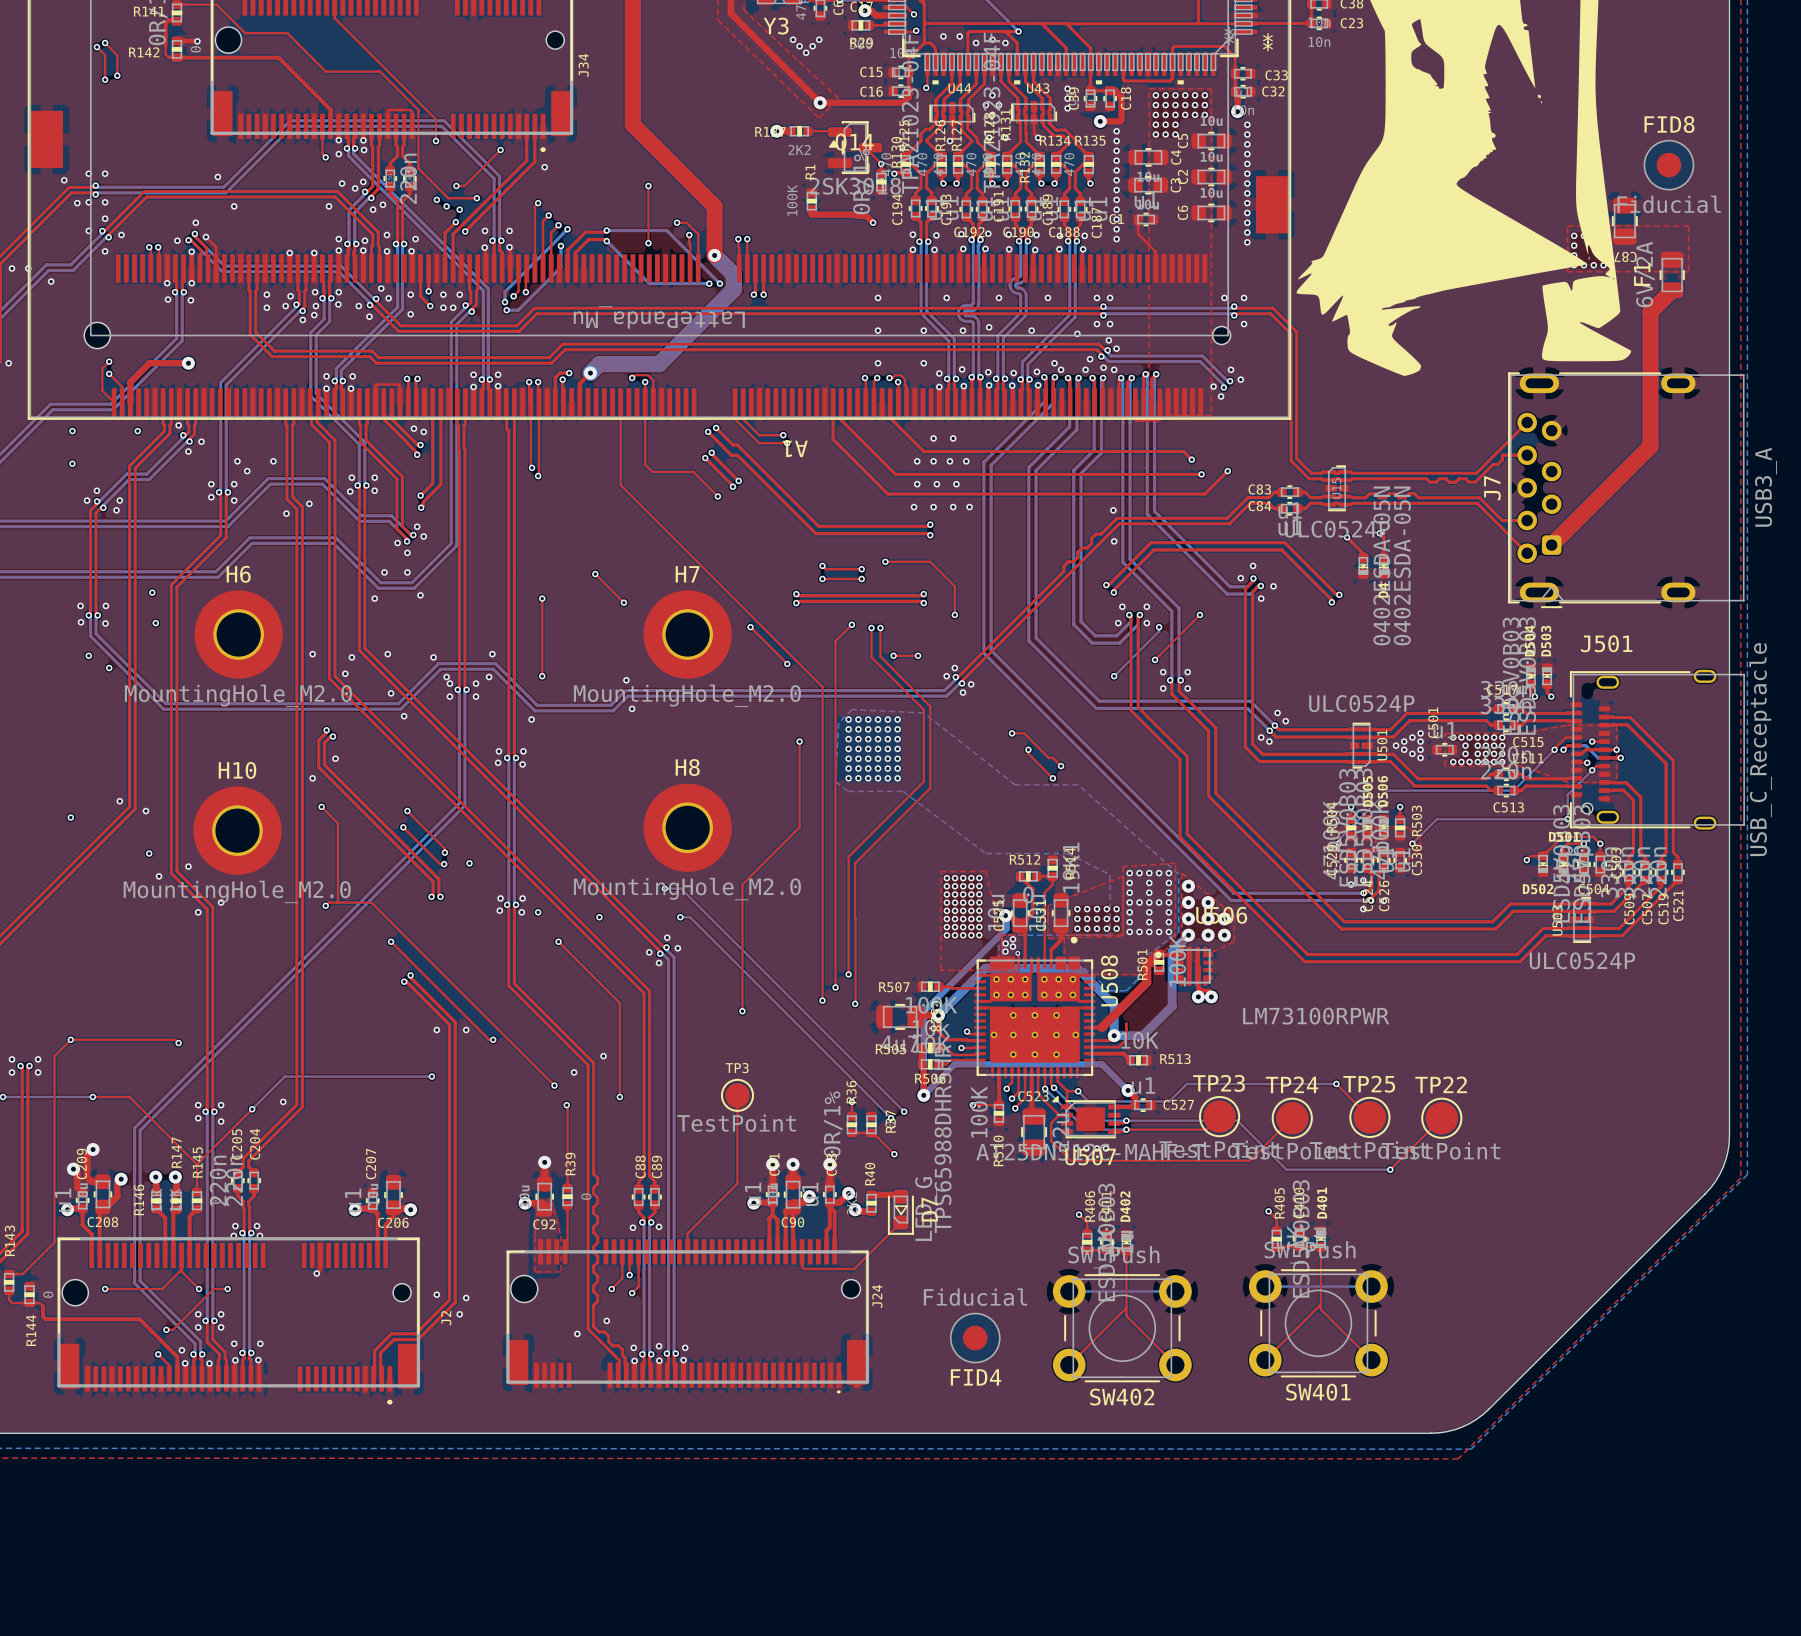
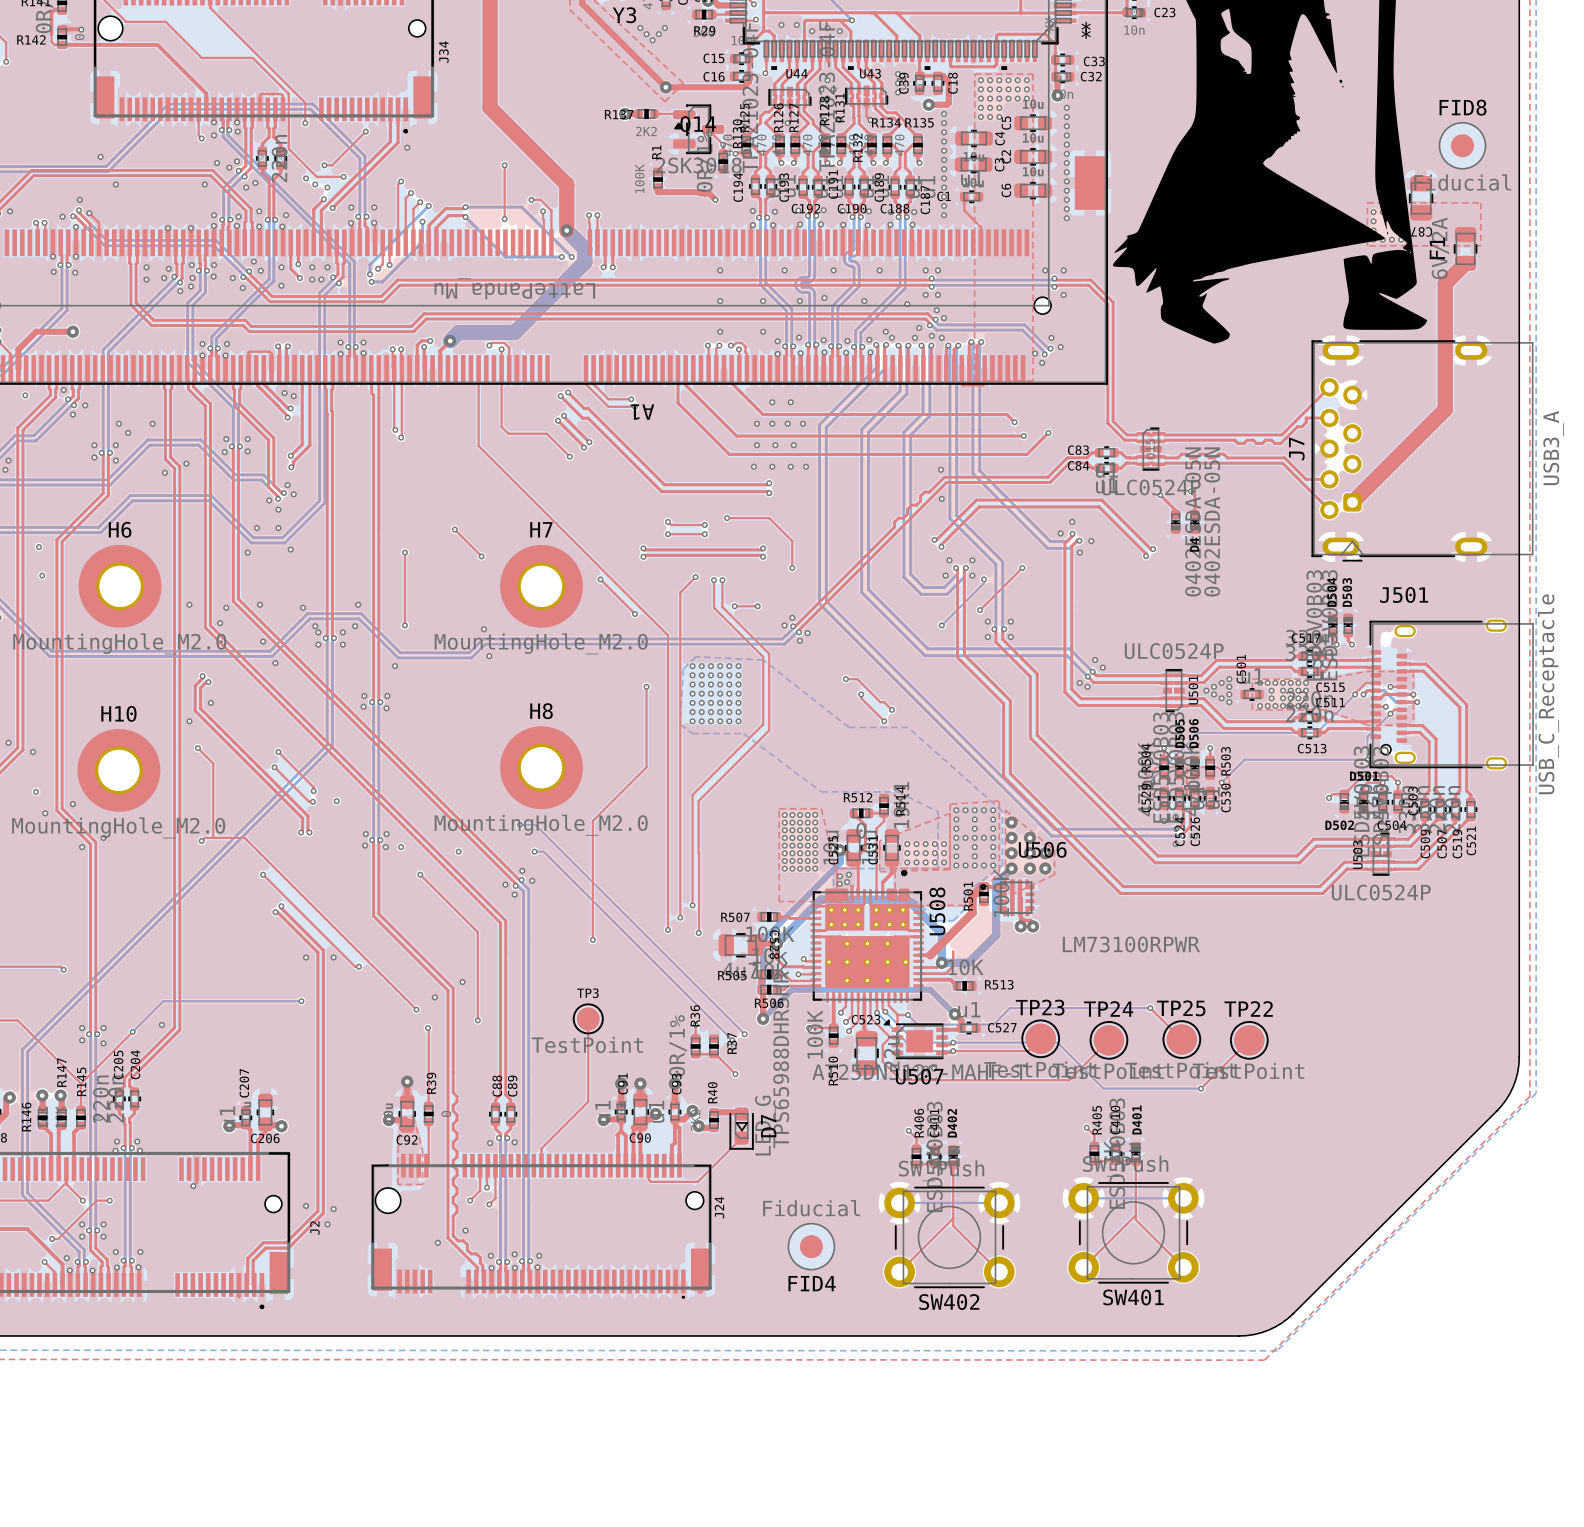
via: (1012, 939) -> none
via: none -> (848, 874)
via: (1012, 946) -> none
via: none -> (847, 882)
via: (1017, 953) -> none

